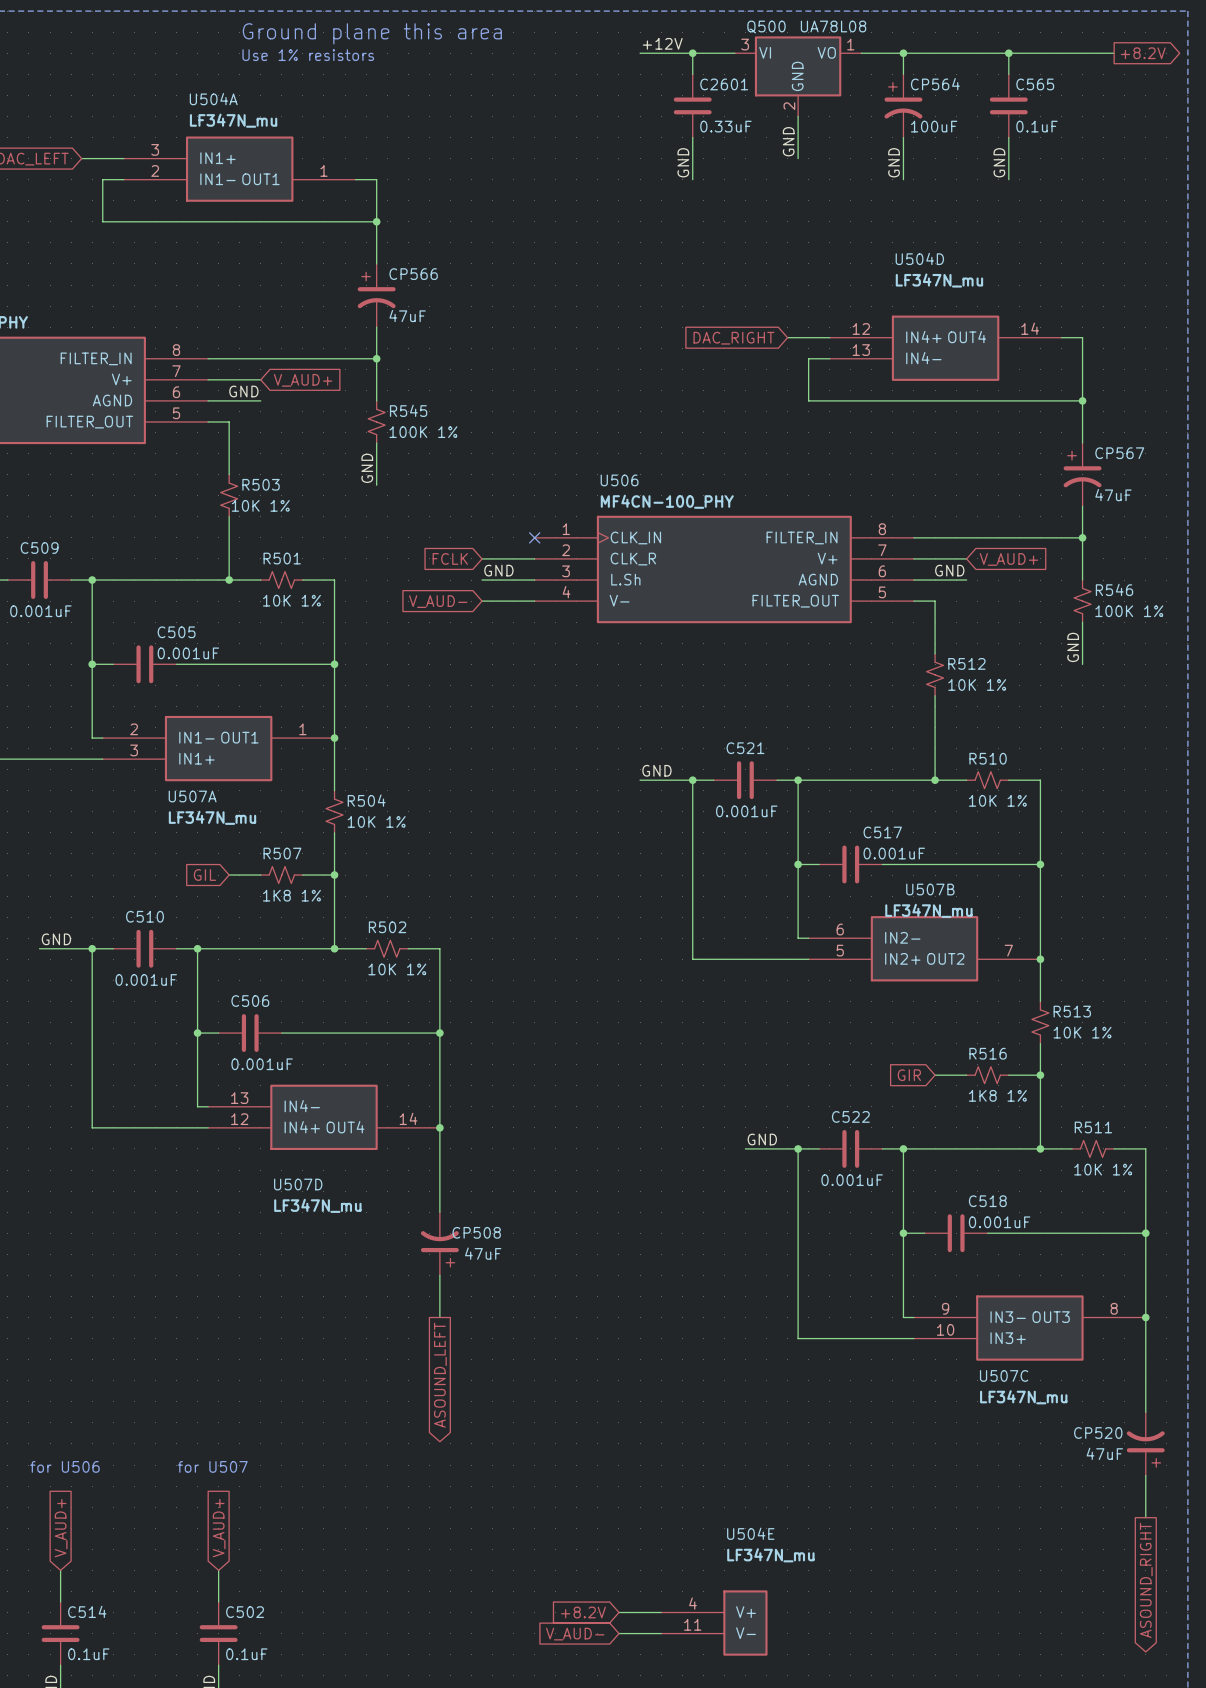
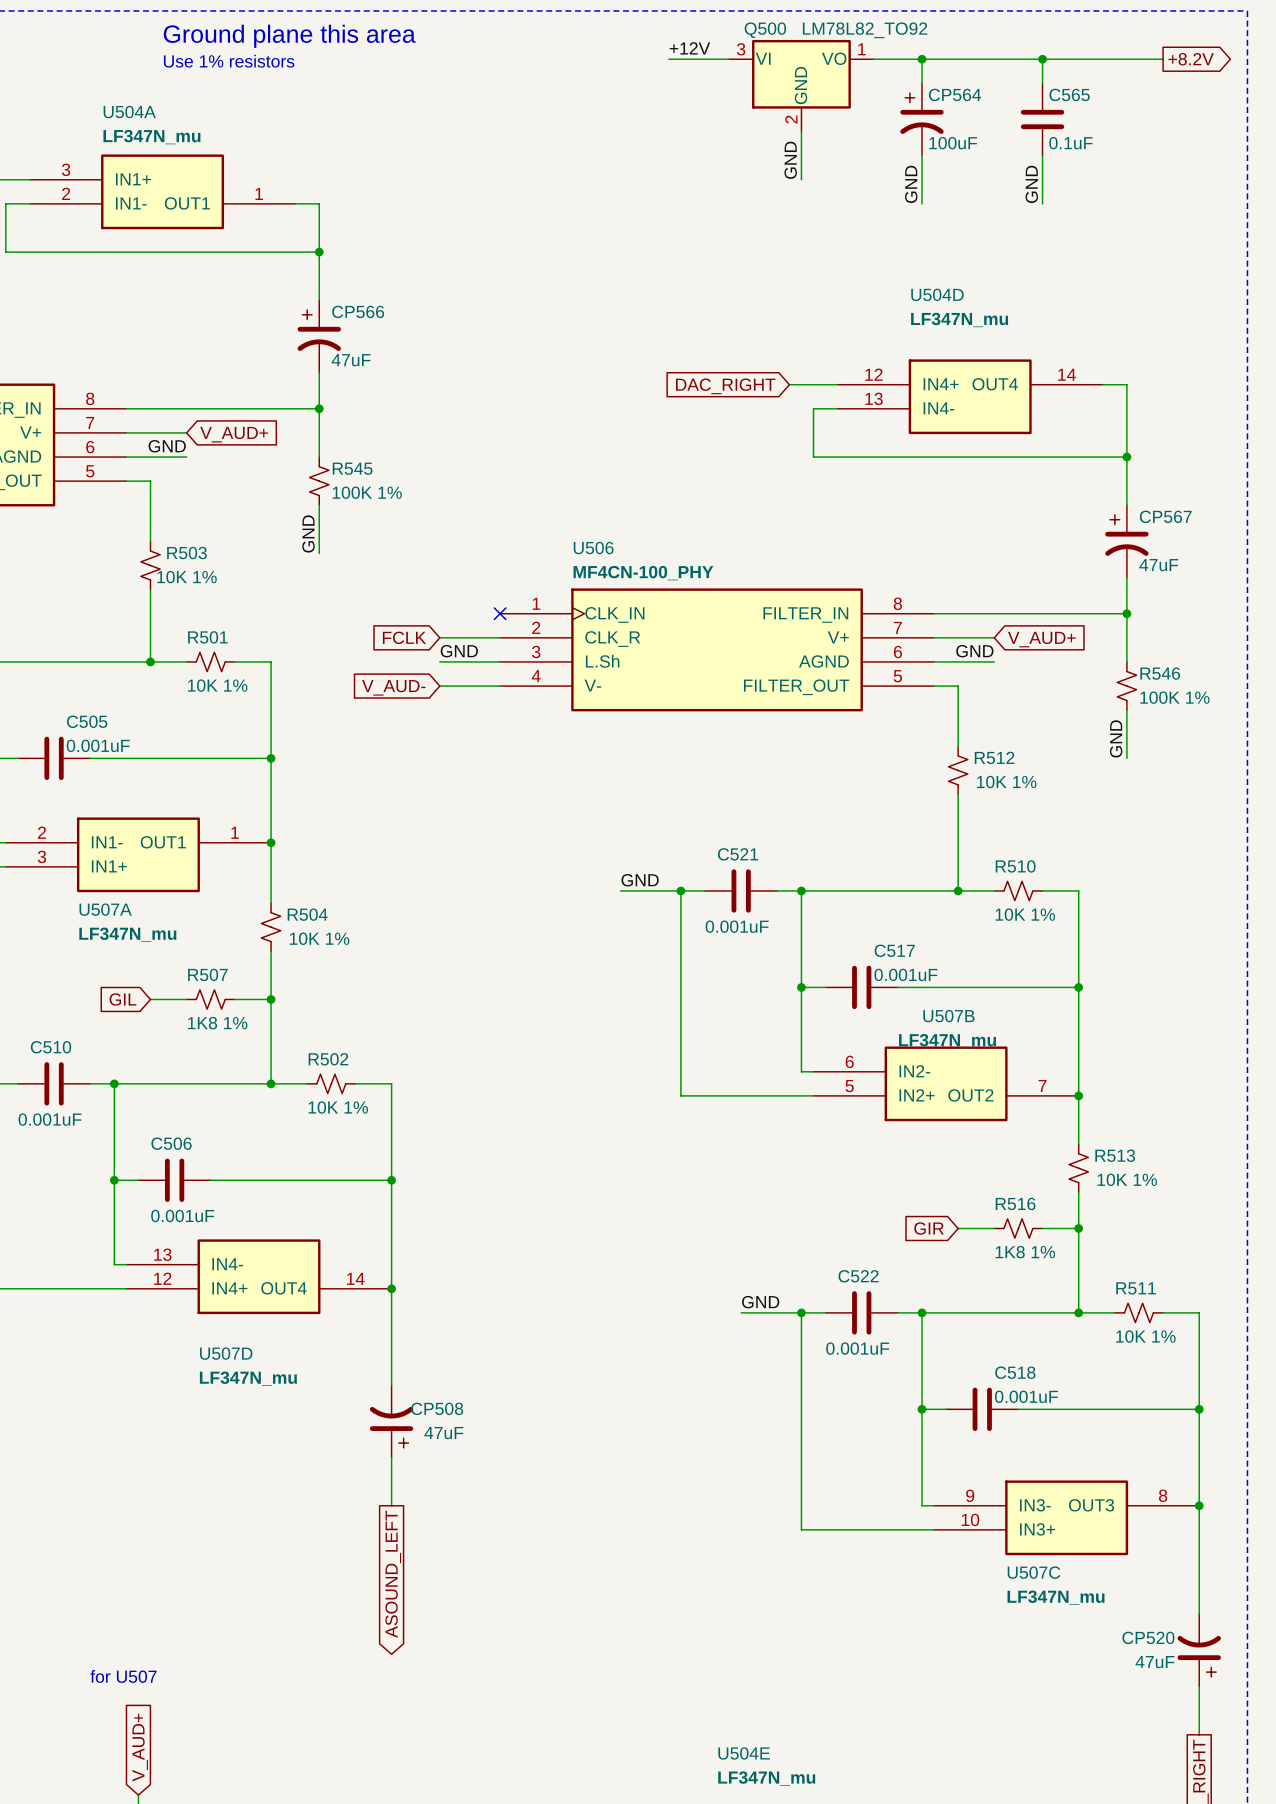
Q500 value: UA78L08 (833, 26) -> LM78L82_TO92 (865, 30)
label position: +12V (662, 43) -> +12V (689, 48)
wire: (640, 53) (682, 53) -> none
wire: (692, 53) (692, 74) -> none
junction: (692, 53) -> none
C2601: 0.33uF (692, 105) -> none
wire: (692, 137) (692, 179) -> none
label: GND (683, 162) -> none

